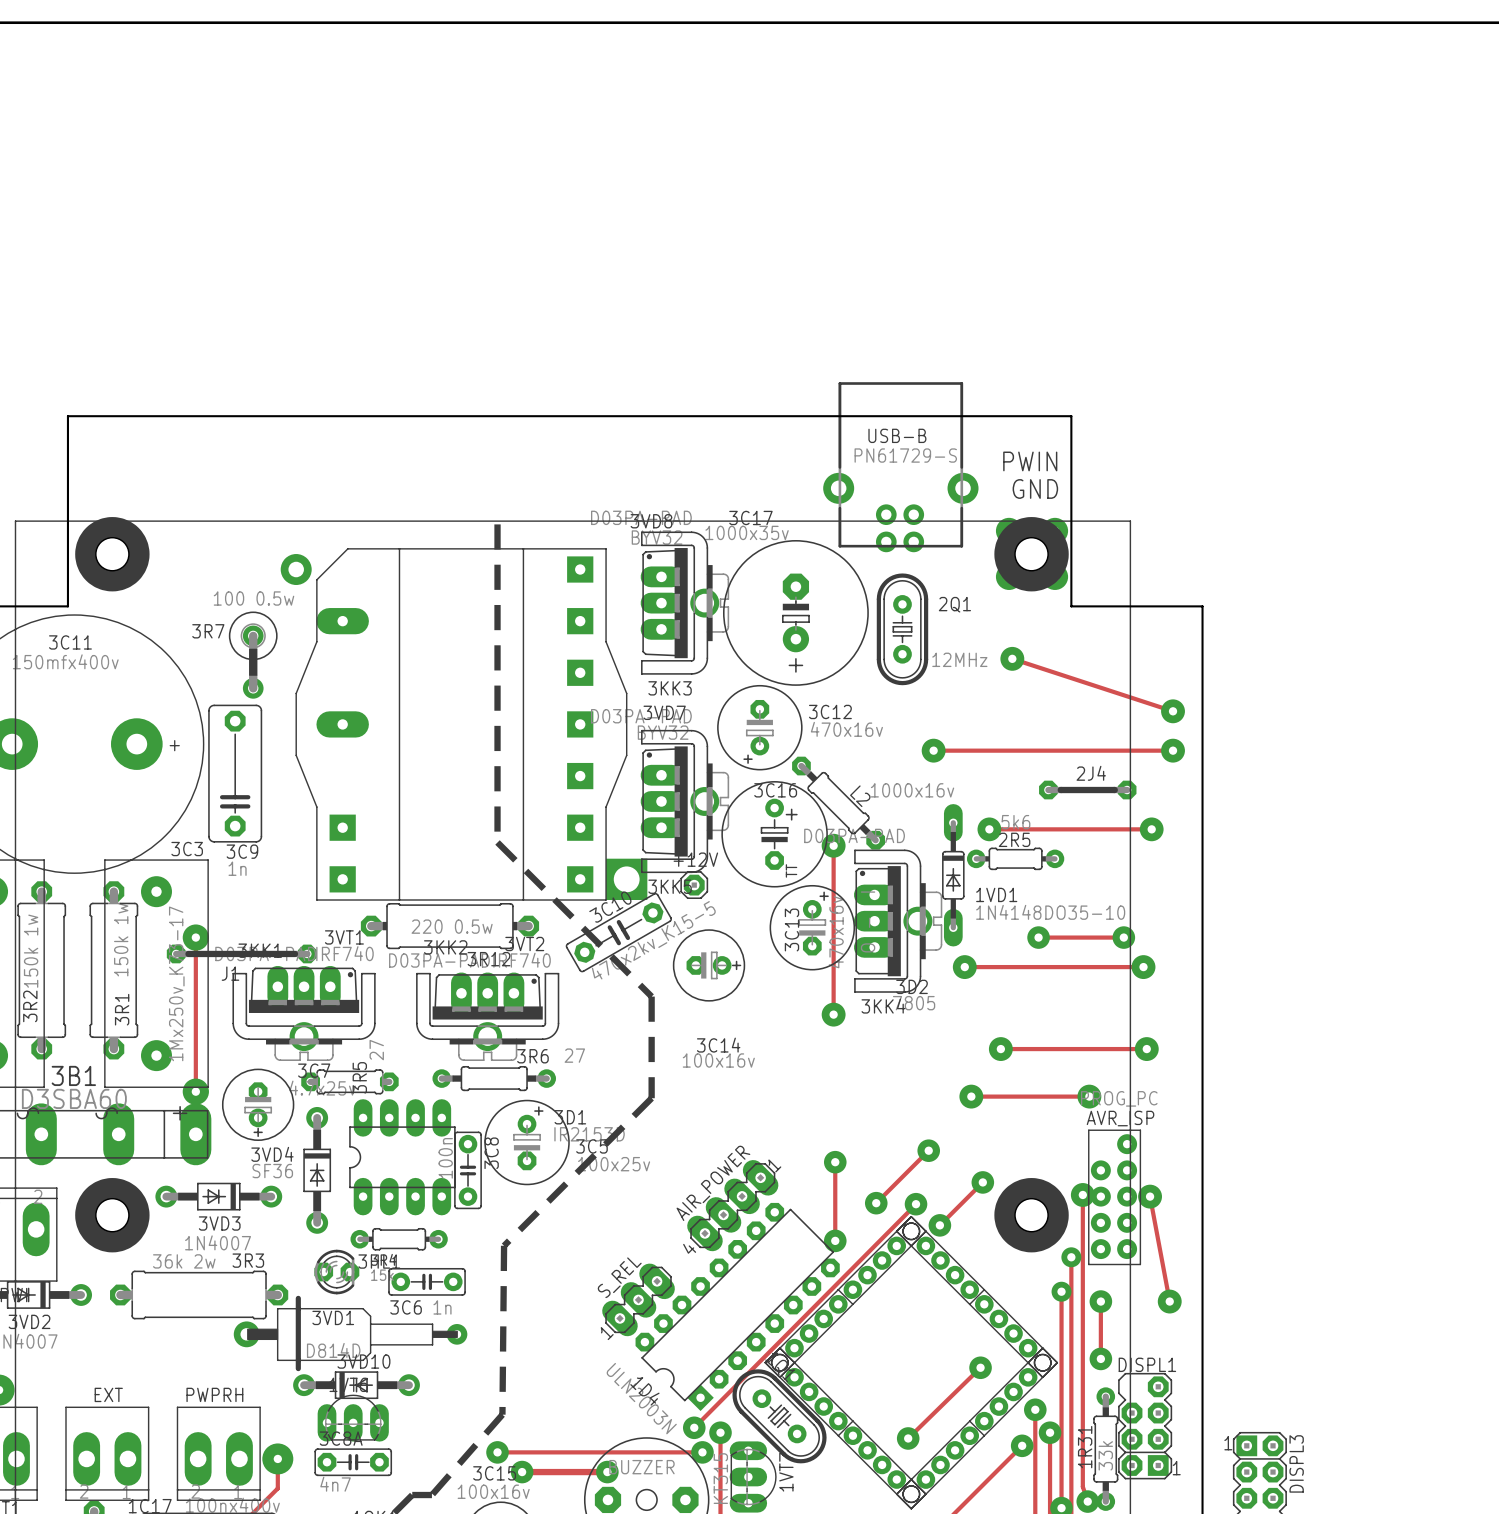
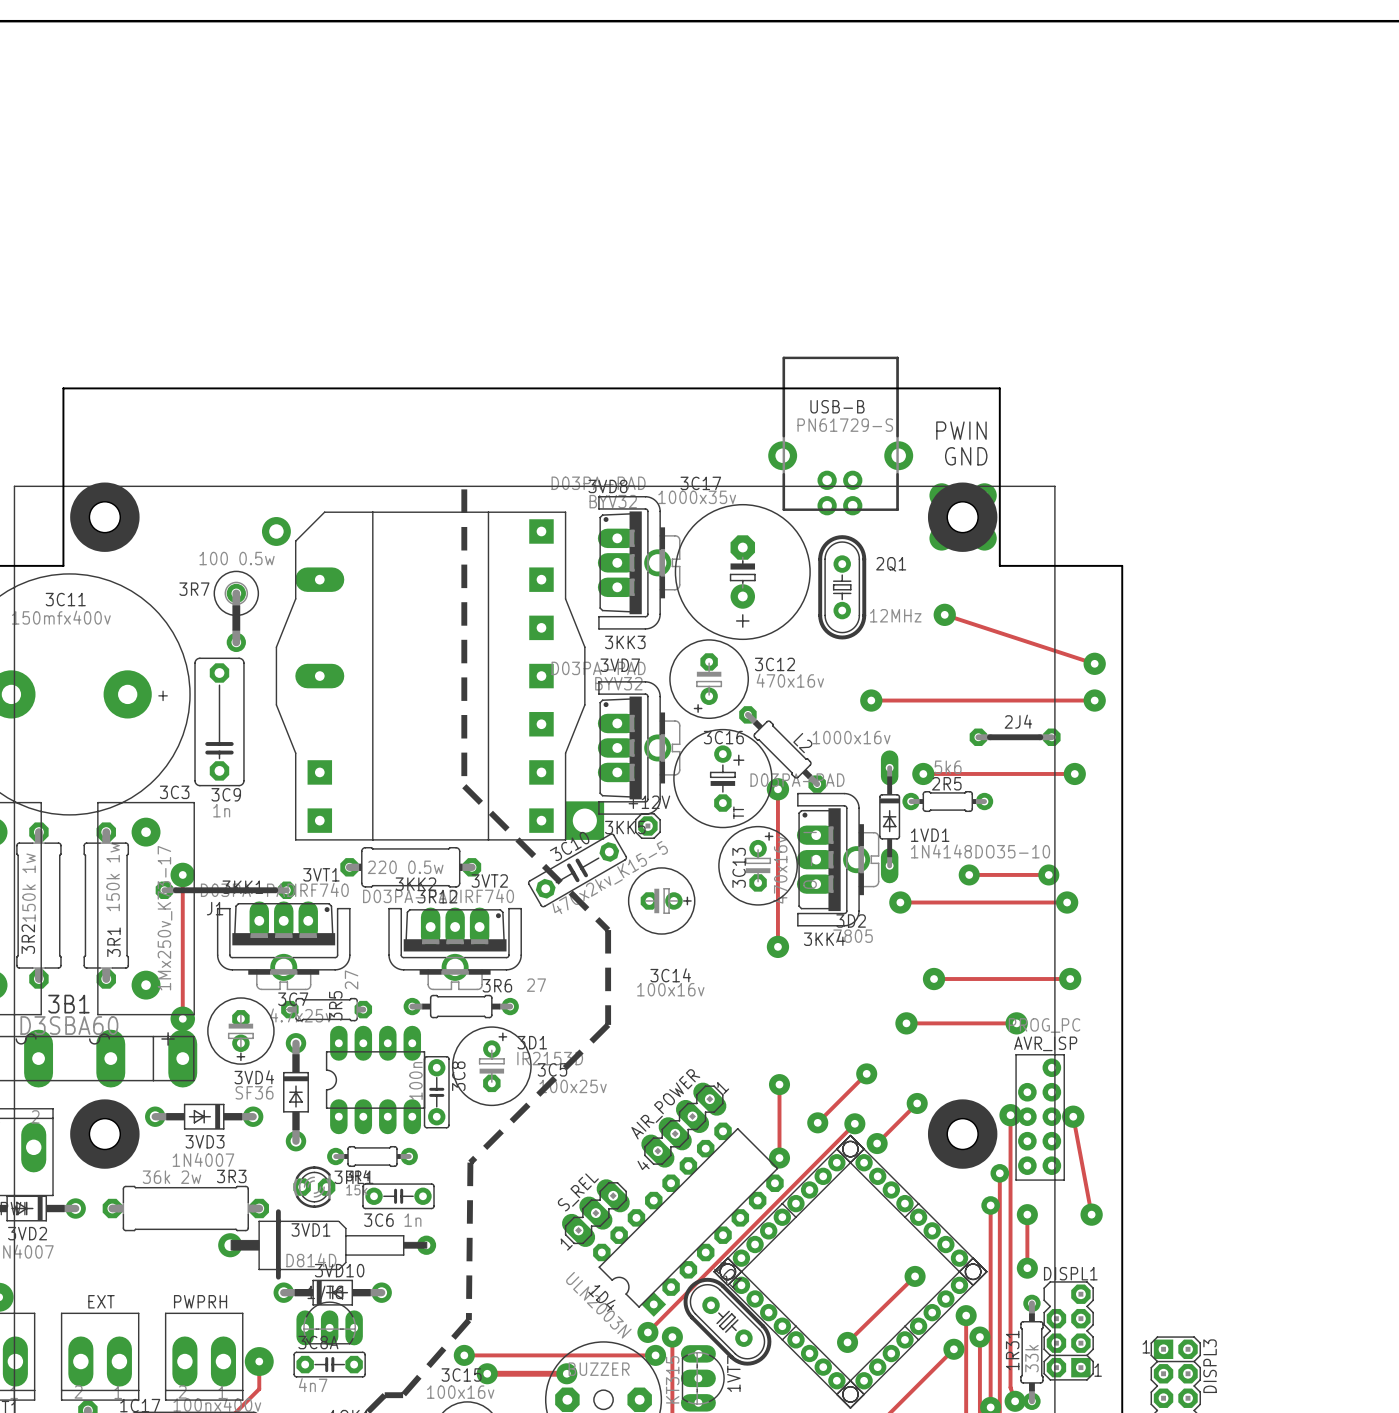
3R12 footprint: [360, 903, 540, 950] -> [340, 846, 482, 888]

